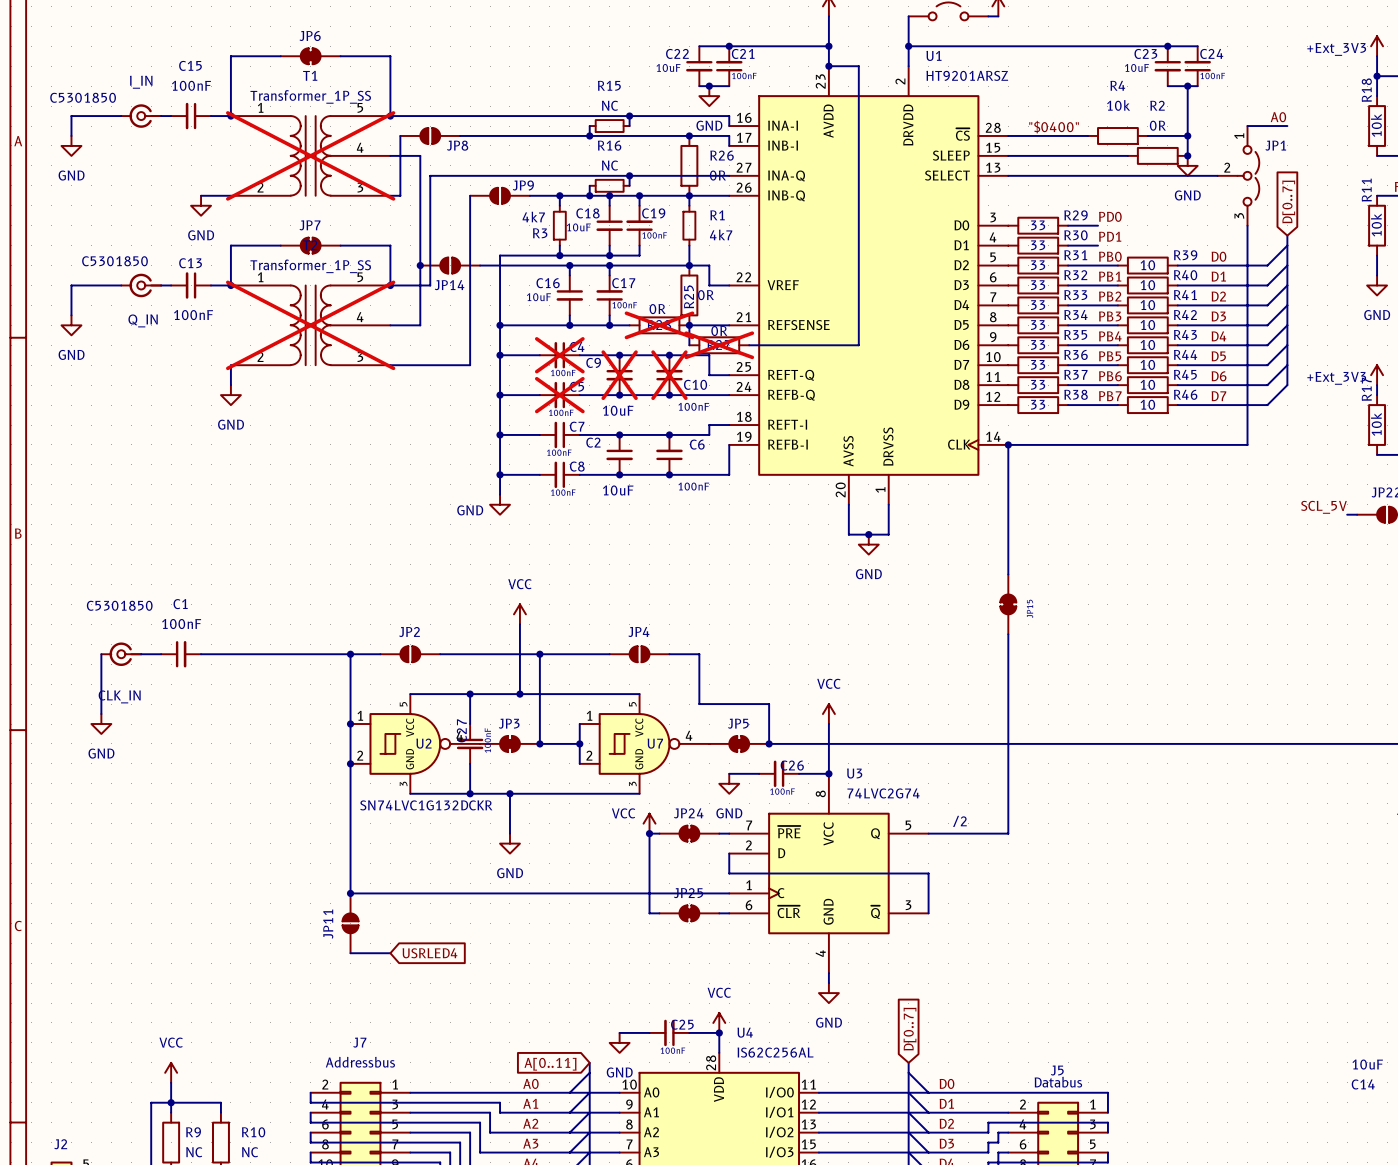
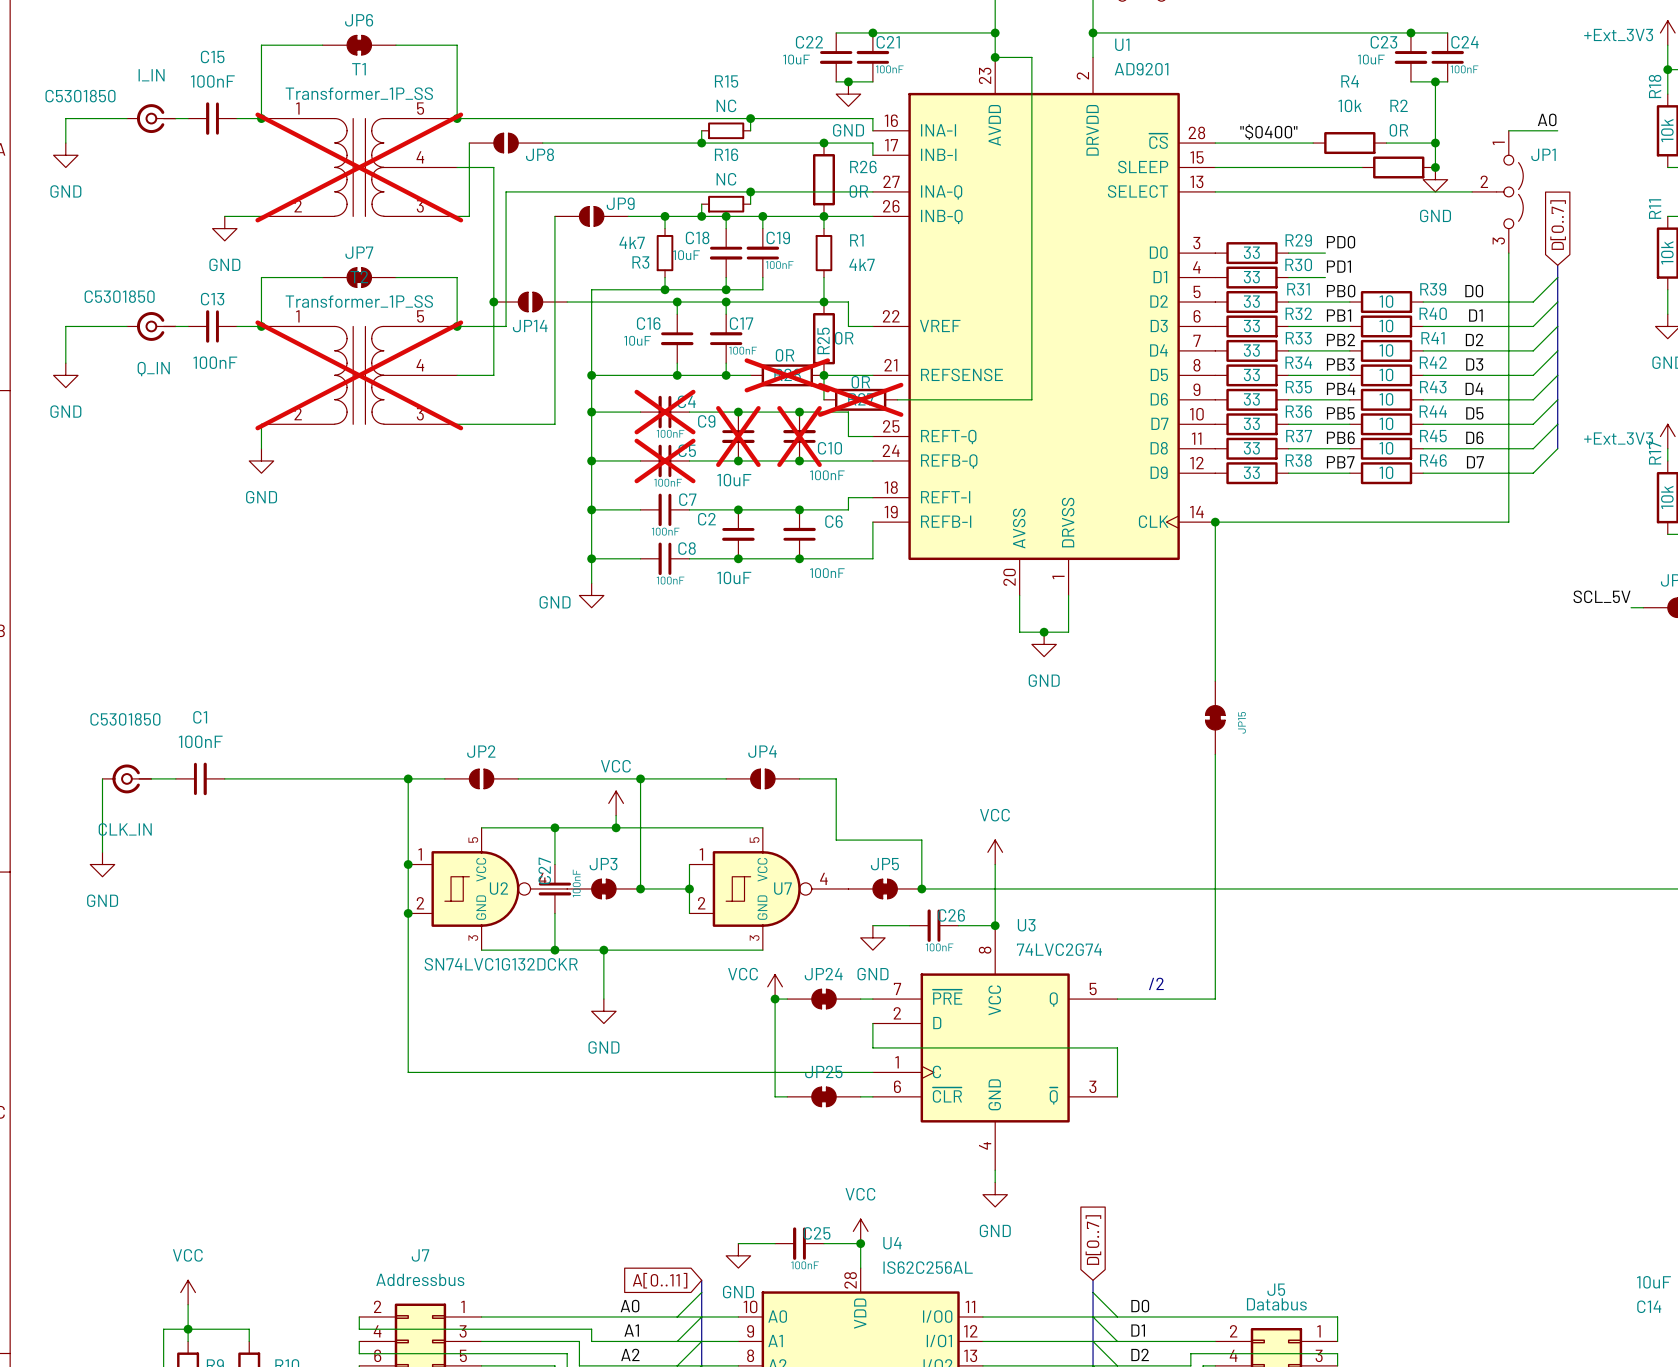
U1 value: HT9201ARSZ (967, 75) -> AD9201 (1141, 69)
power symbol position: VCC (519, 614) -> VCC (616, 803)
wire: (519, 624) (519, 684) -> none
junction: (350, 893) -> none
JP11: (350, 923) -> none
wire: (350, 953) (390, 953) -> none
global label: USRLED4 (429, 953) -> none

